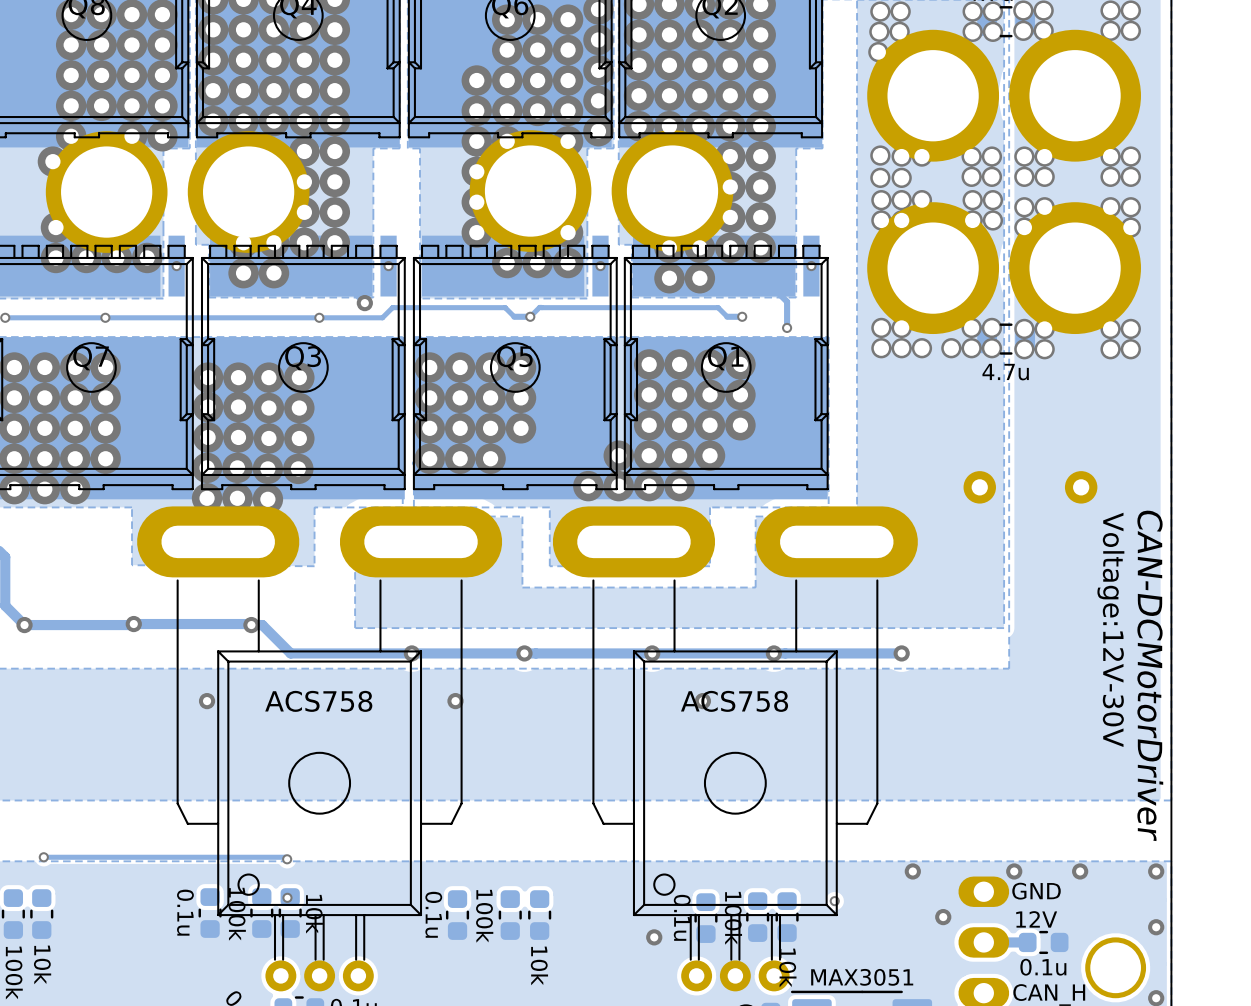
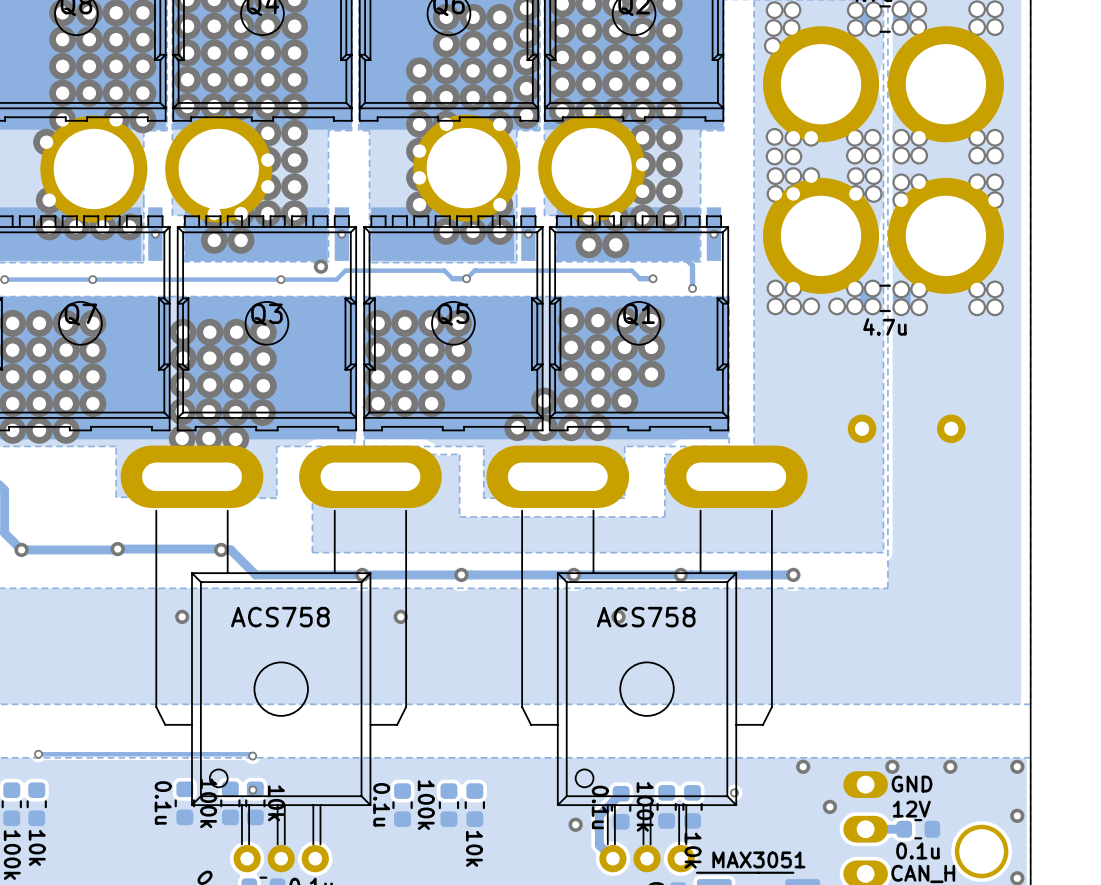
text: Voltage:12V-30V (1110, 629) -> none
text: CAN-DCMotorDriver (1150, 675) -> none
track: none -> (621, 793) (599, 815) (599, 845) (612, 858)

